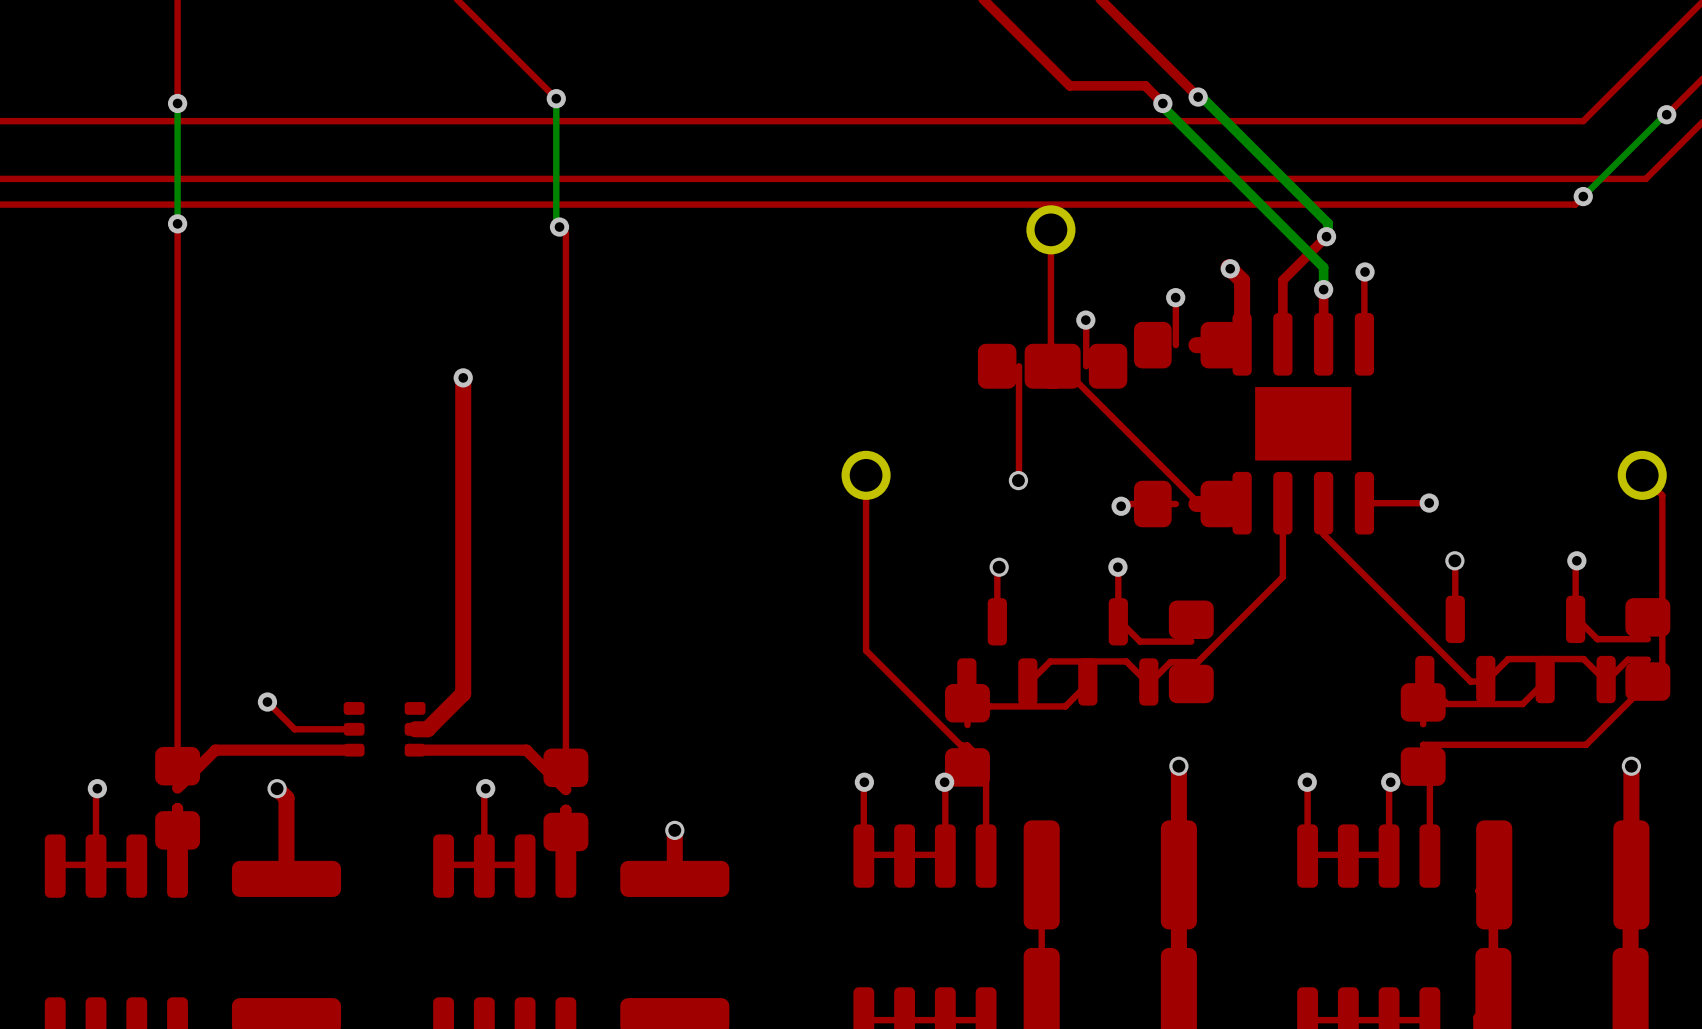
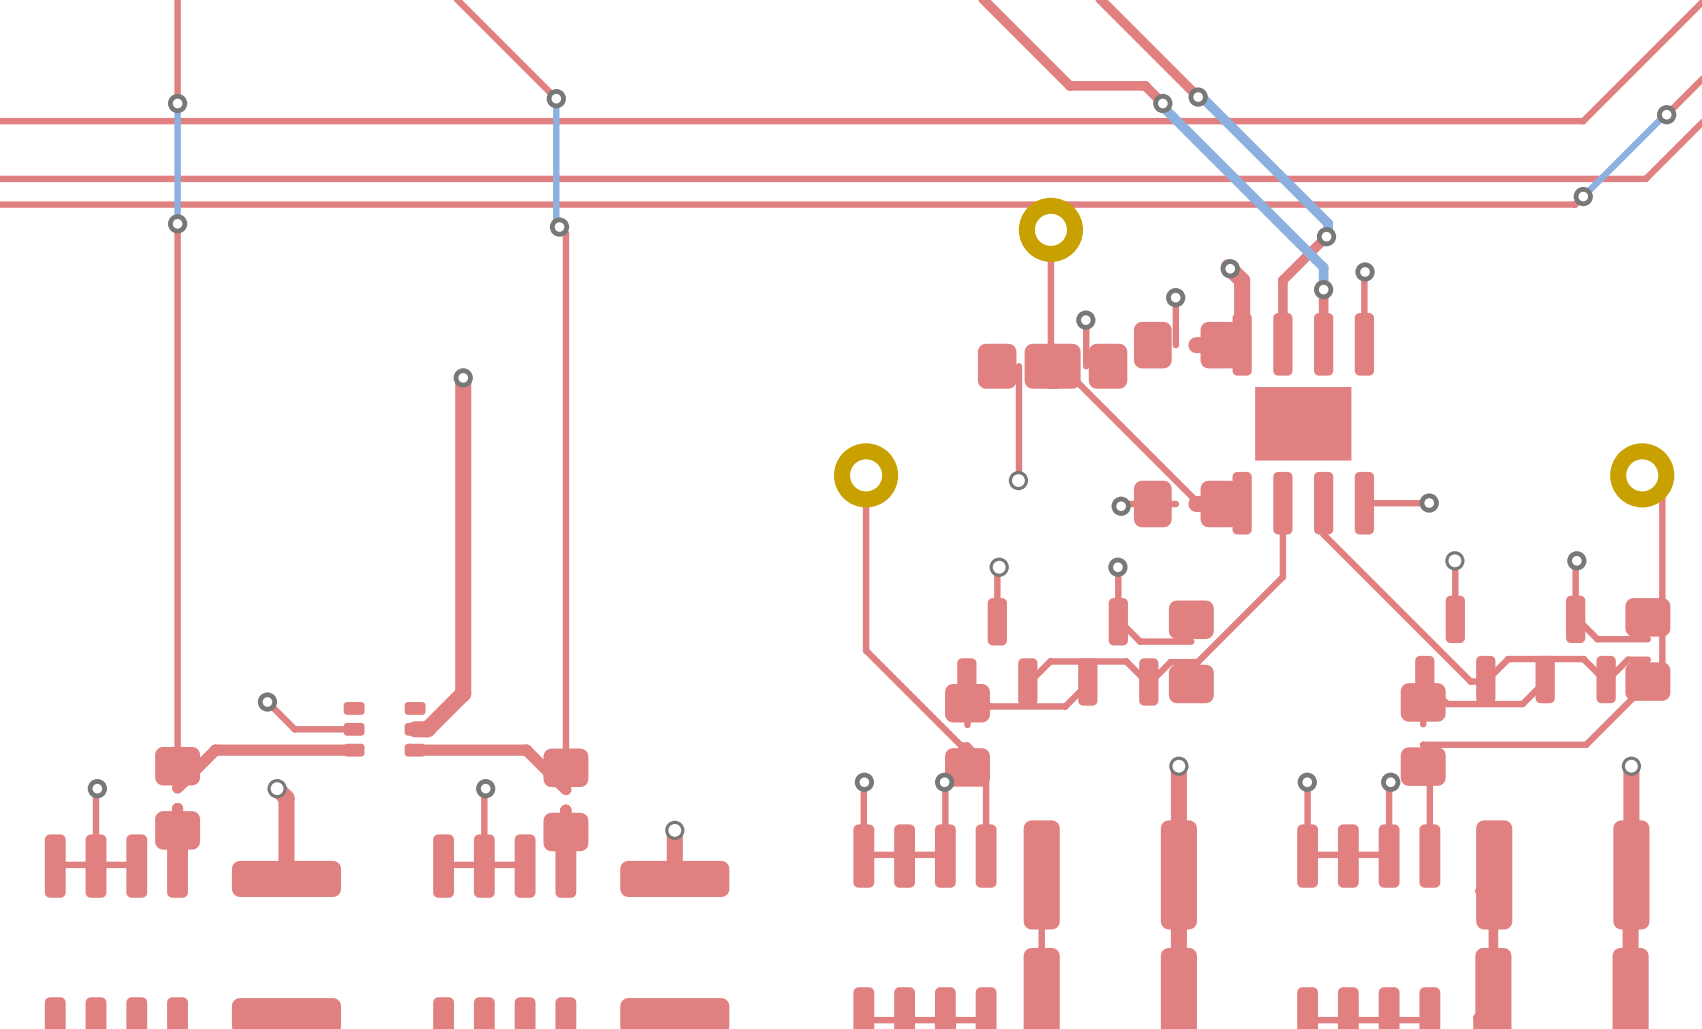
part footprint: [1026, 205, 1076, 255] -> [1018, 197, 1084, 262]
part footprint: [841, 450, 891, 500] -> [833, 443, 899, 508]
part footprint: [1617, 450, 1667, 500] -> [1610, 443, 1675, 508]

